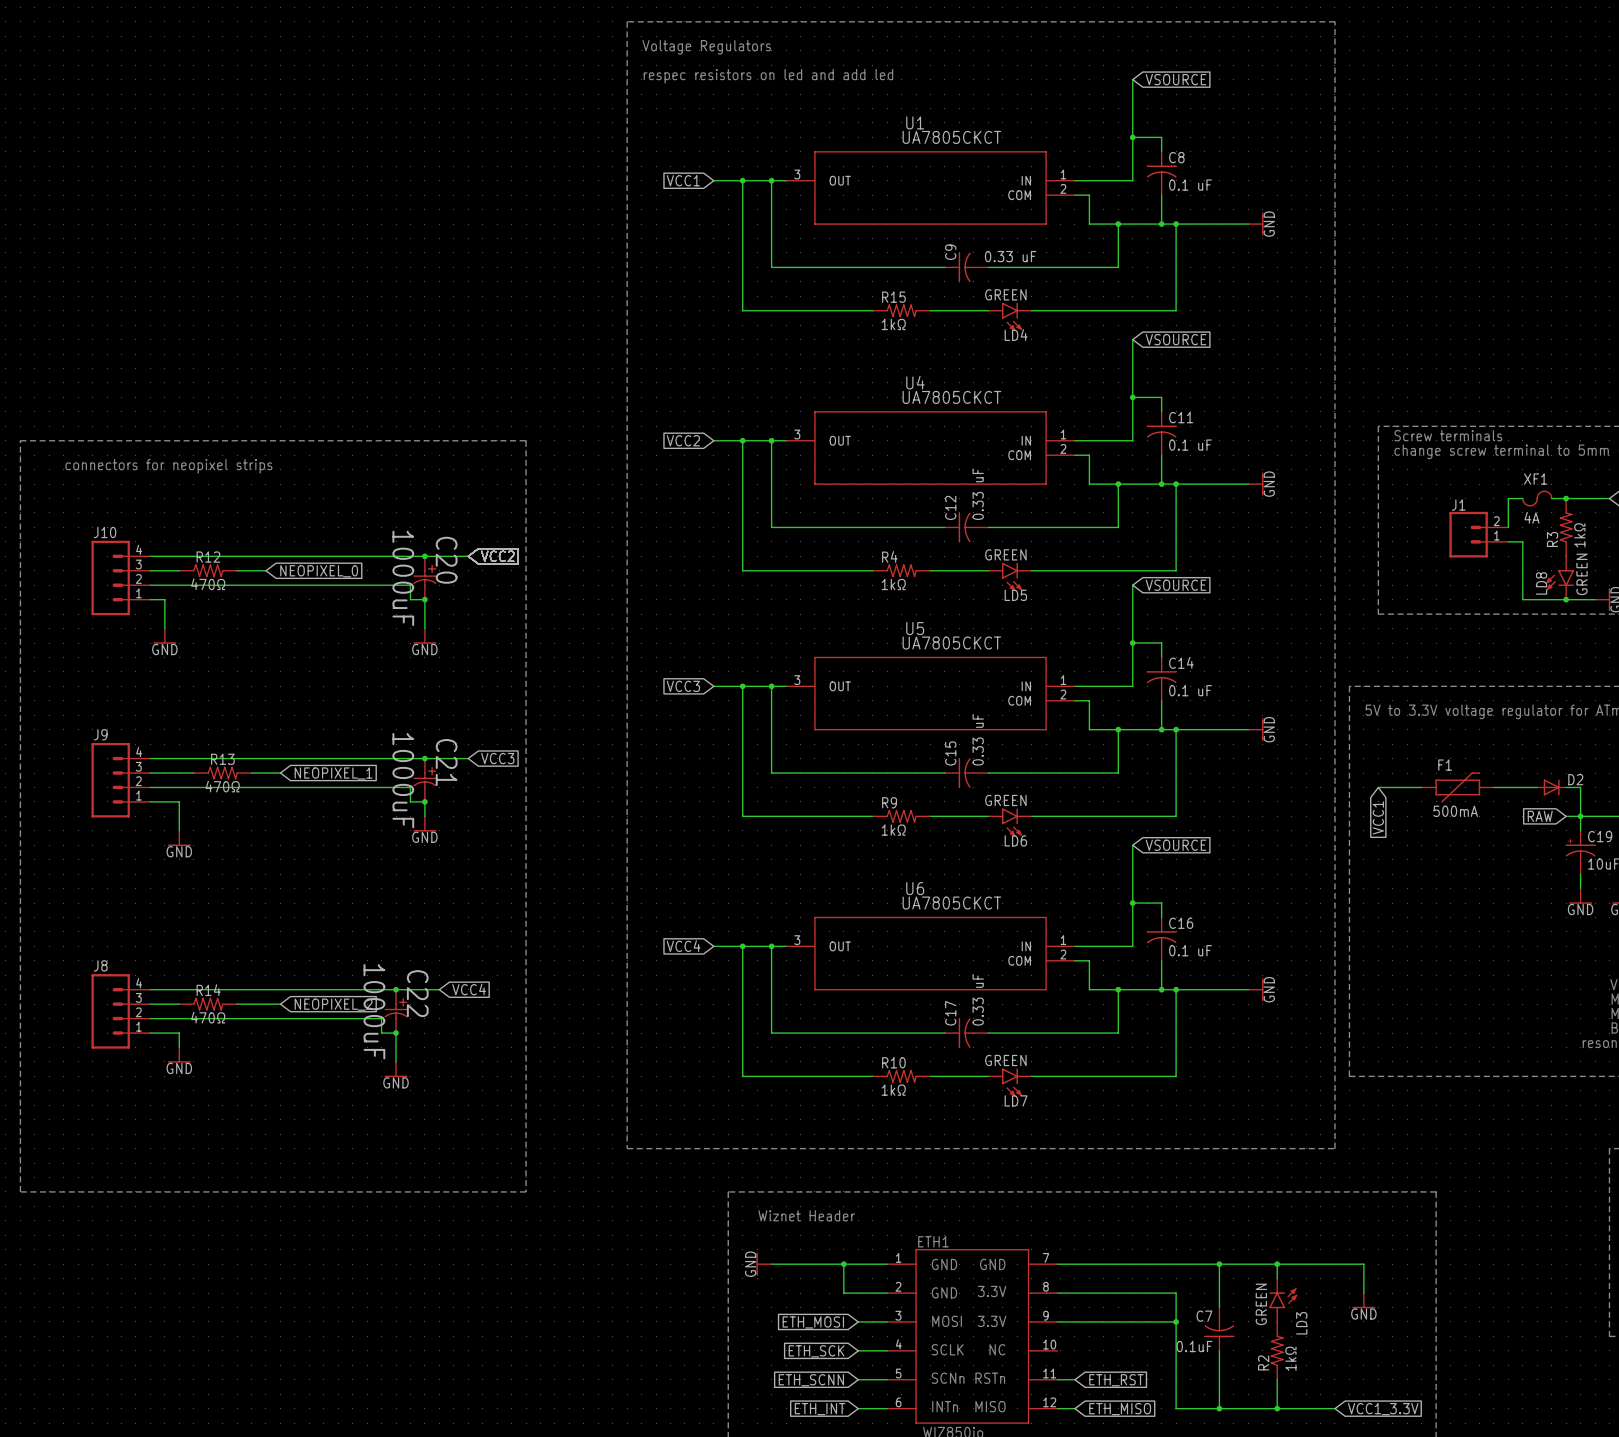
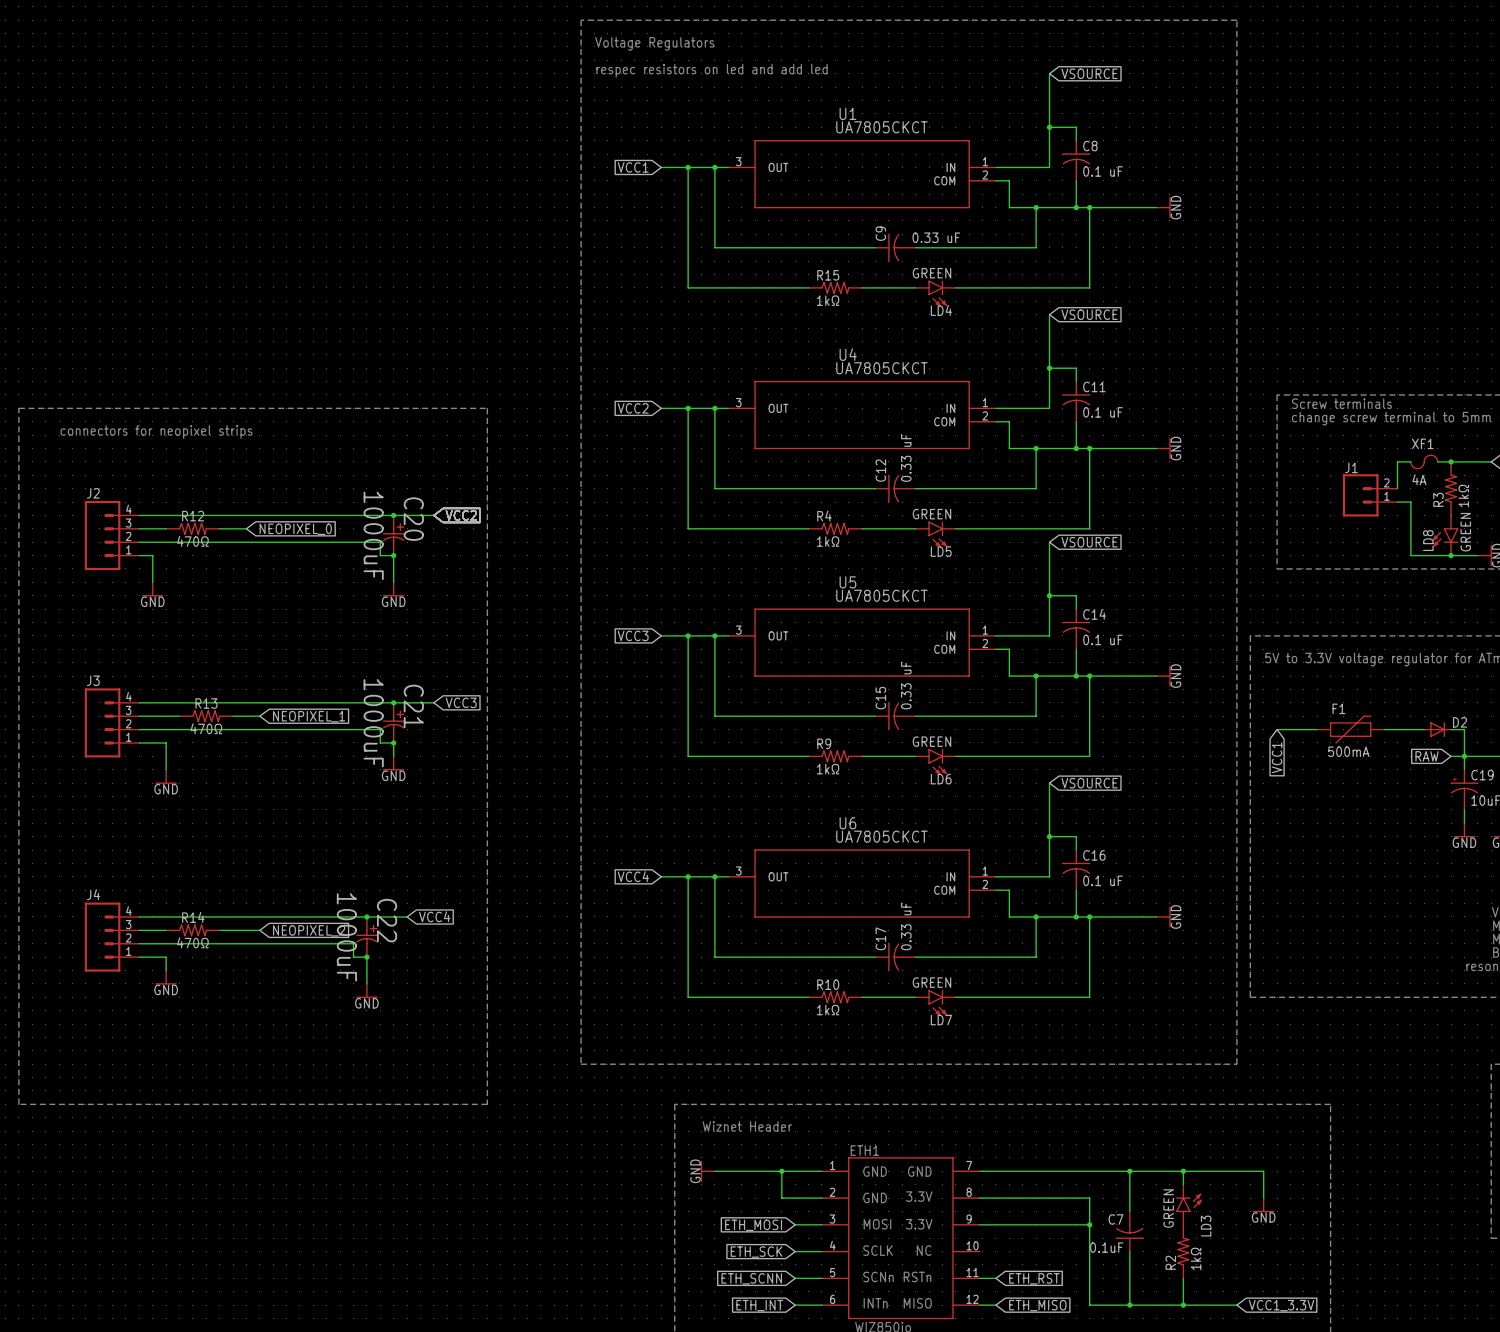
J10 name: J10 (105, 532) -> J2 (93, 493)
J9 name: J9 (100, 734) -> J3 (93, 680)
J8 name: J8 (100, 965) -> J4 (93, 894)

